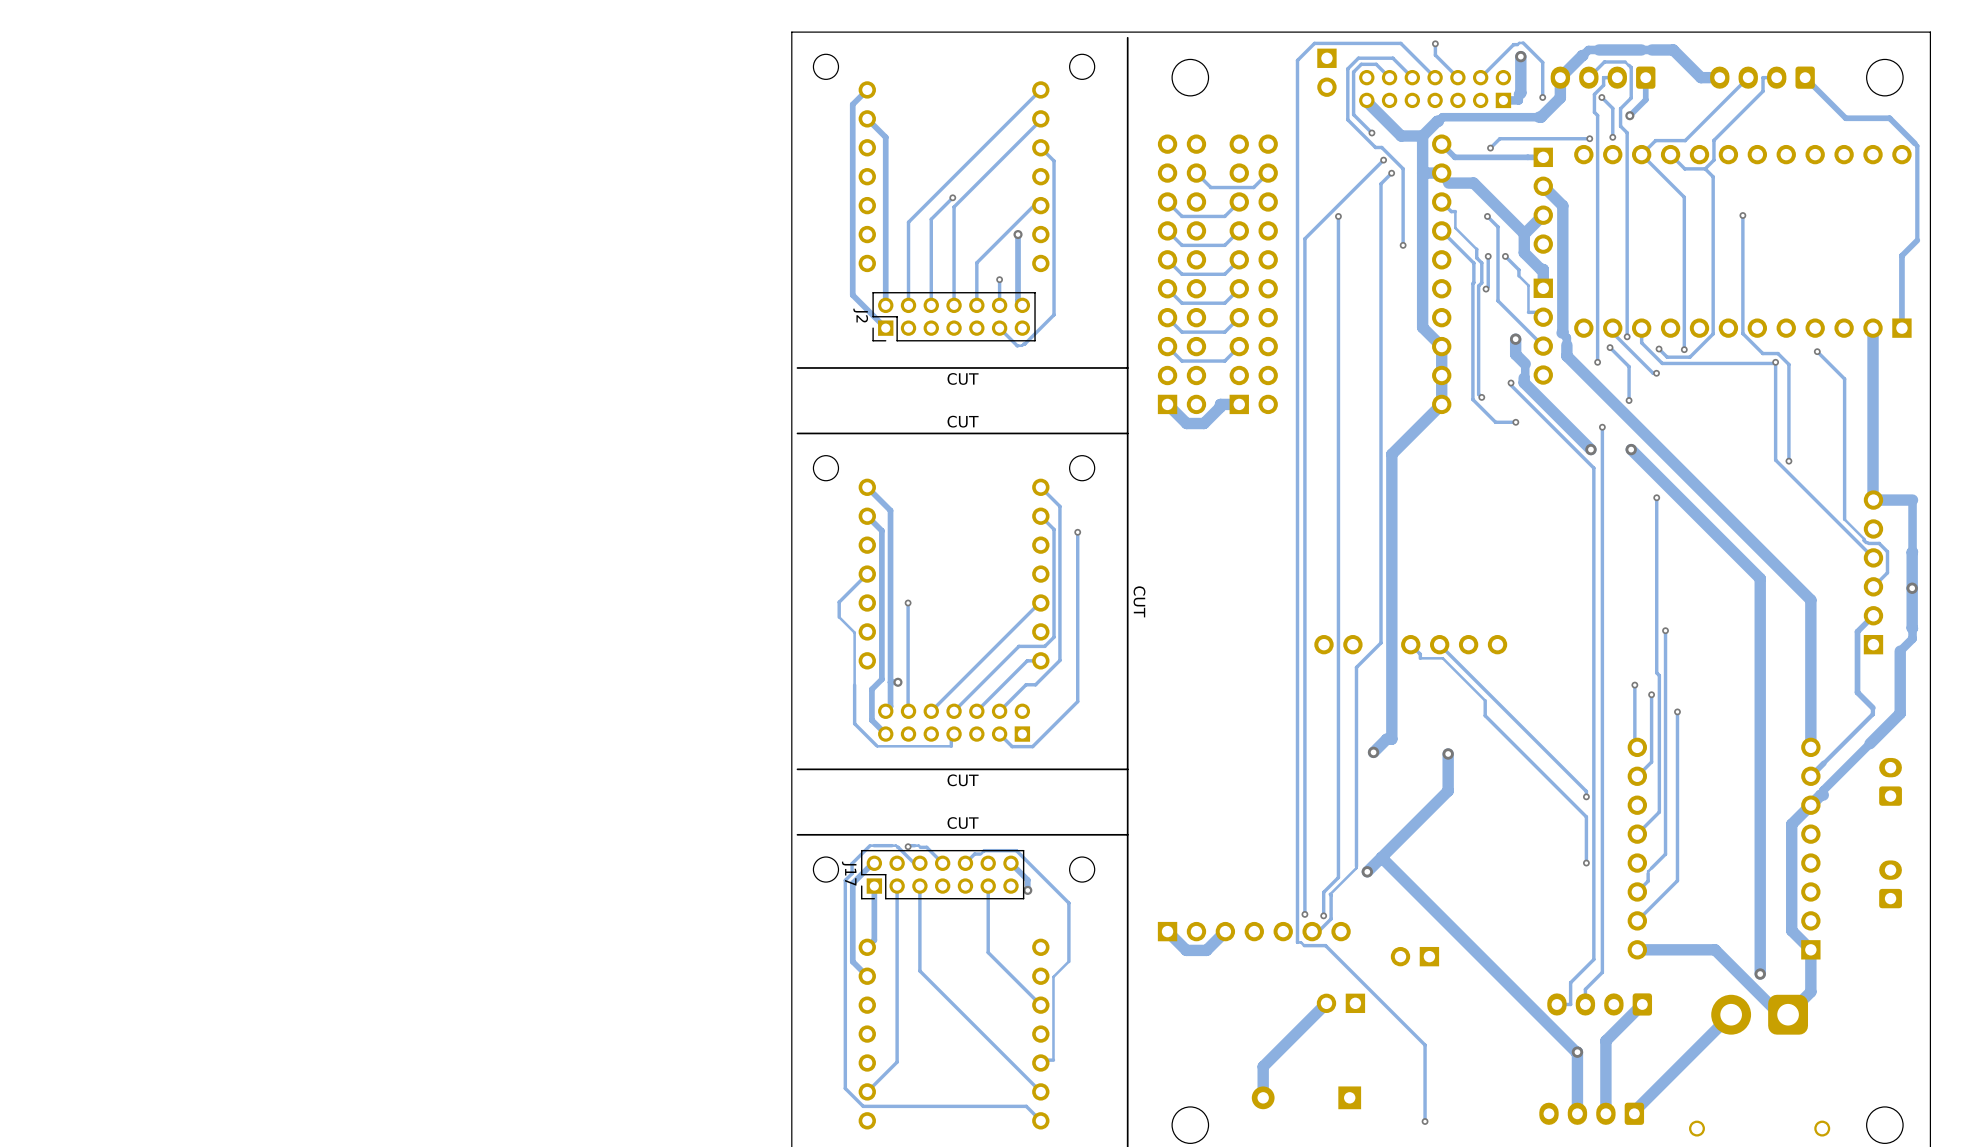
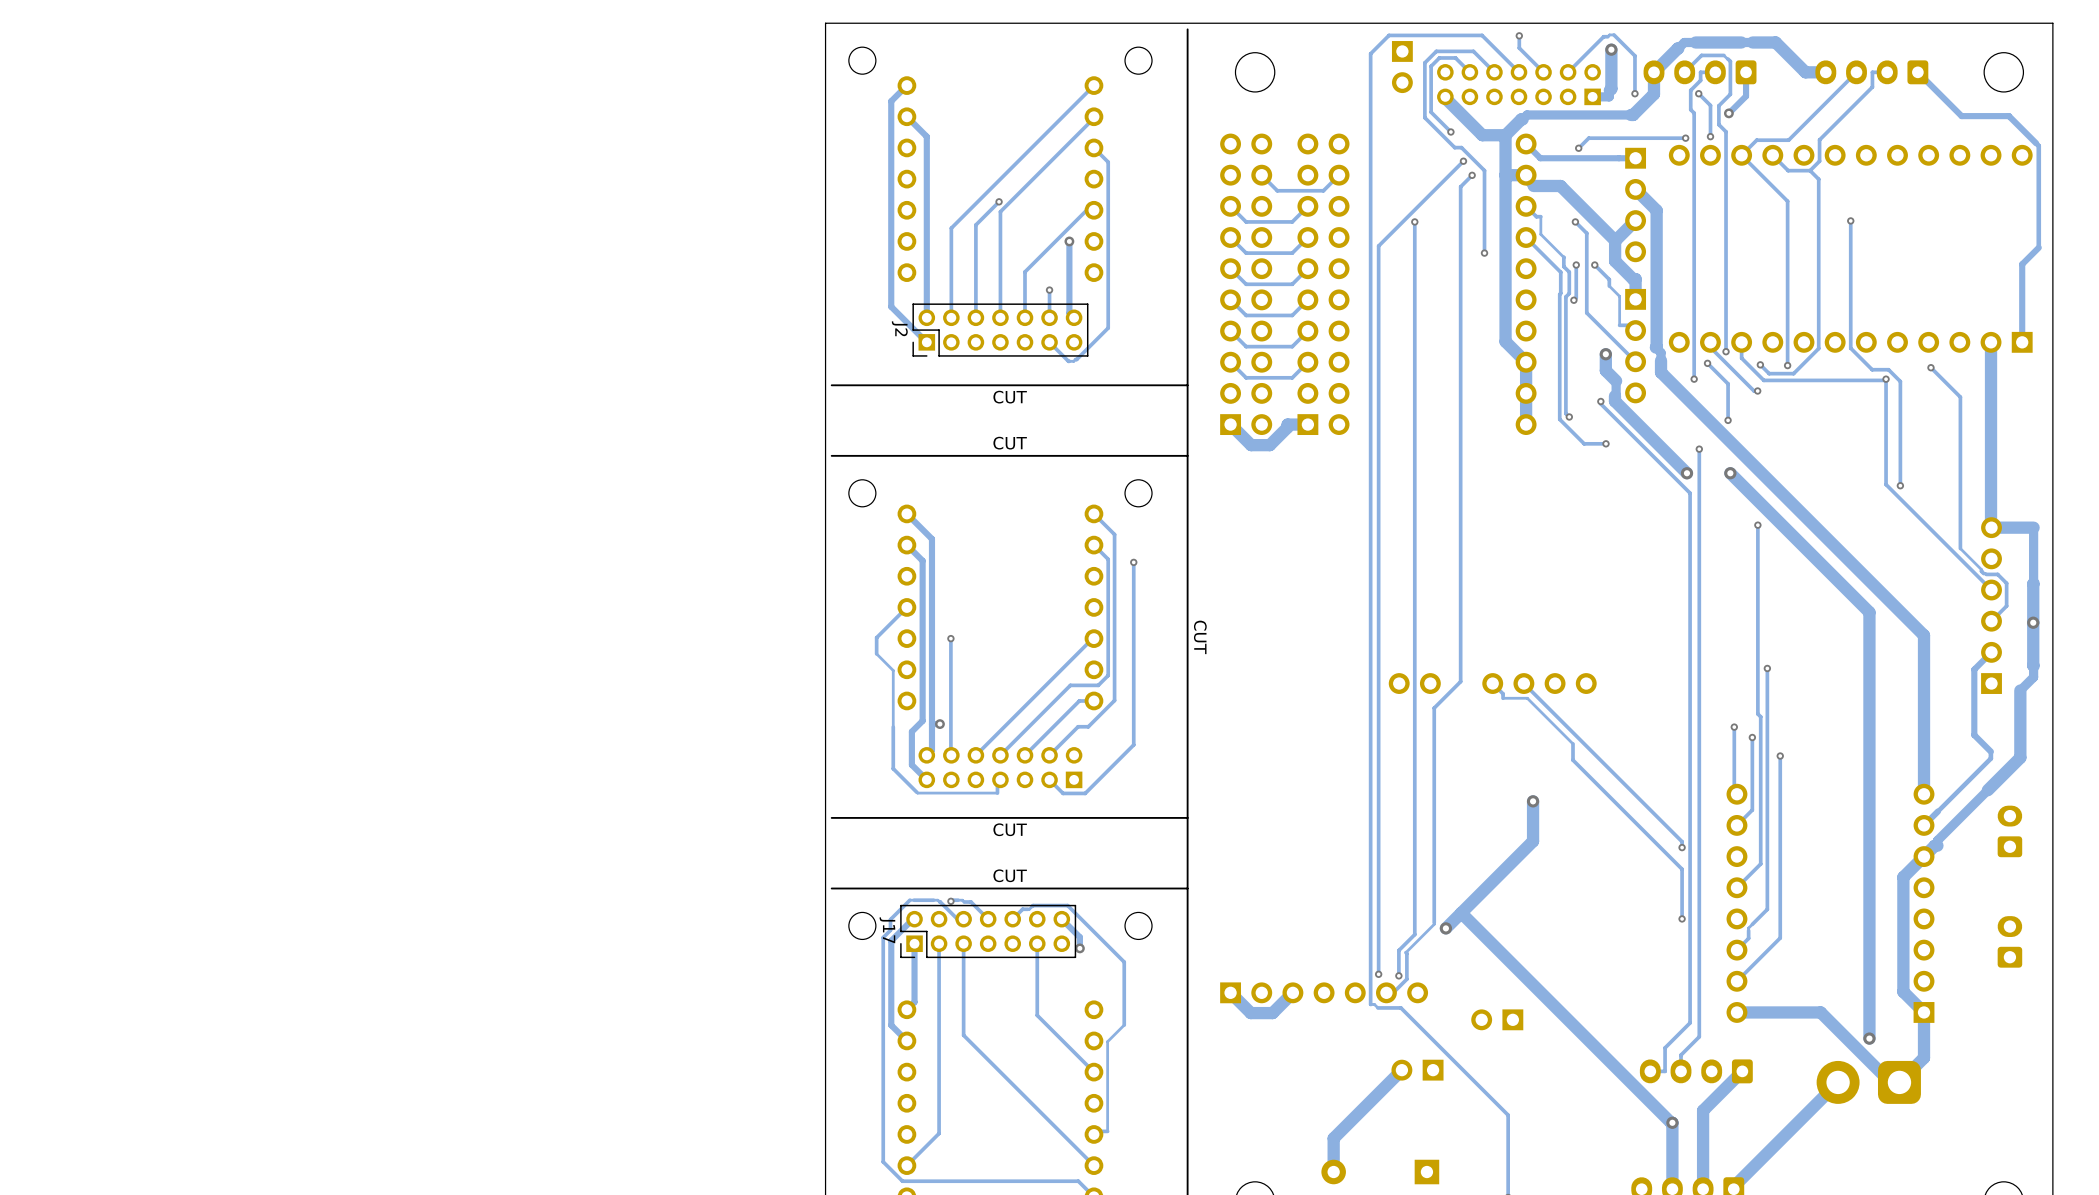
track: (1441, 404) (1391, 454) (1391, 739) (1386, 739) (1373, 752) -> none
via: (1373, 752) -> none

